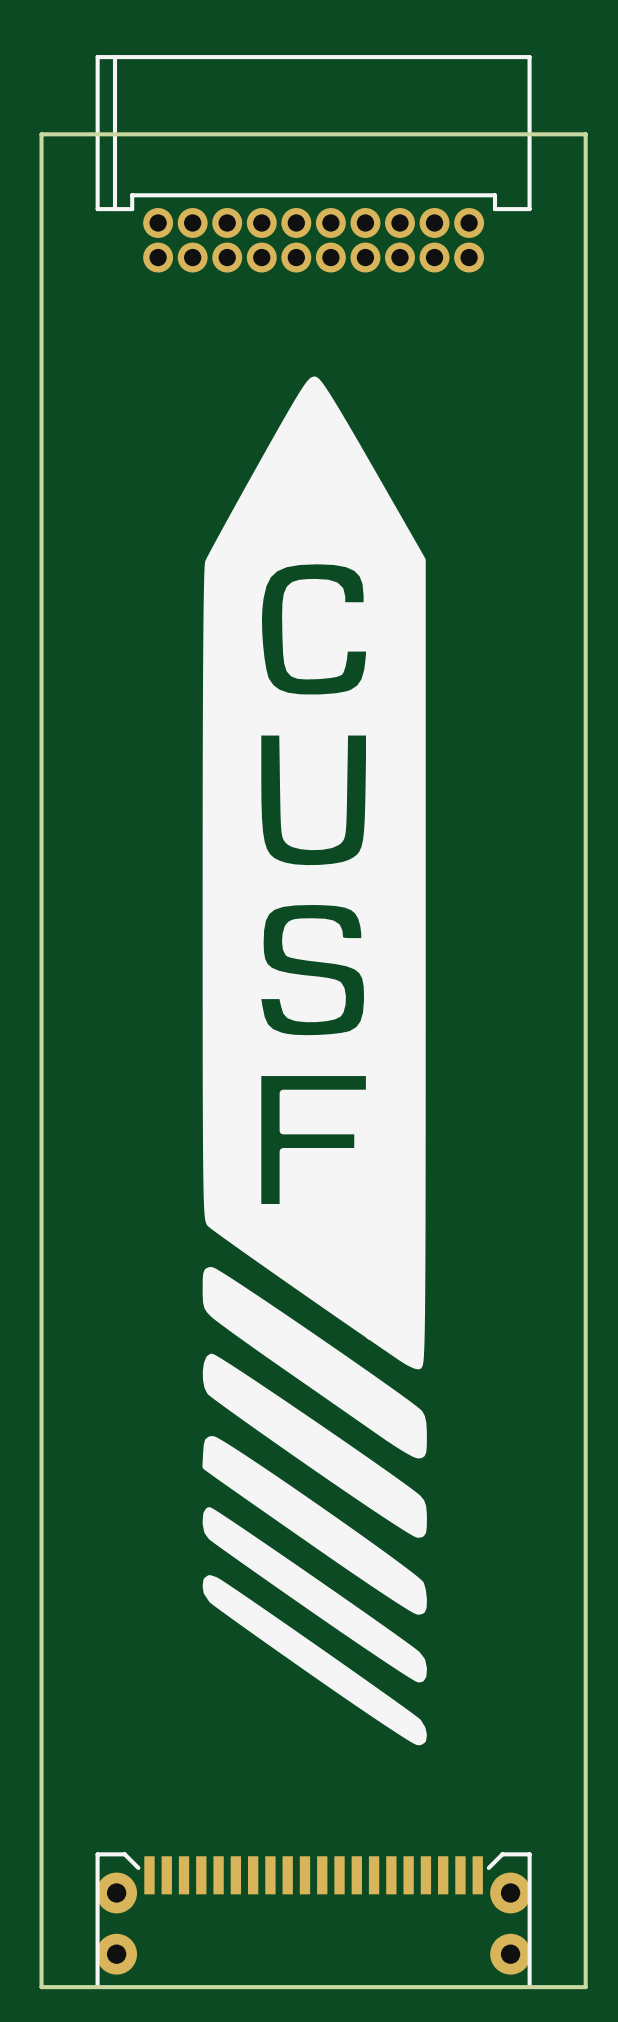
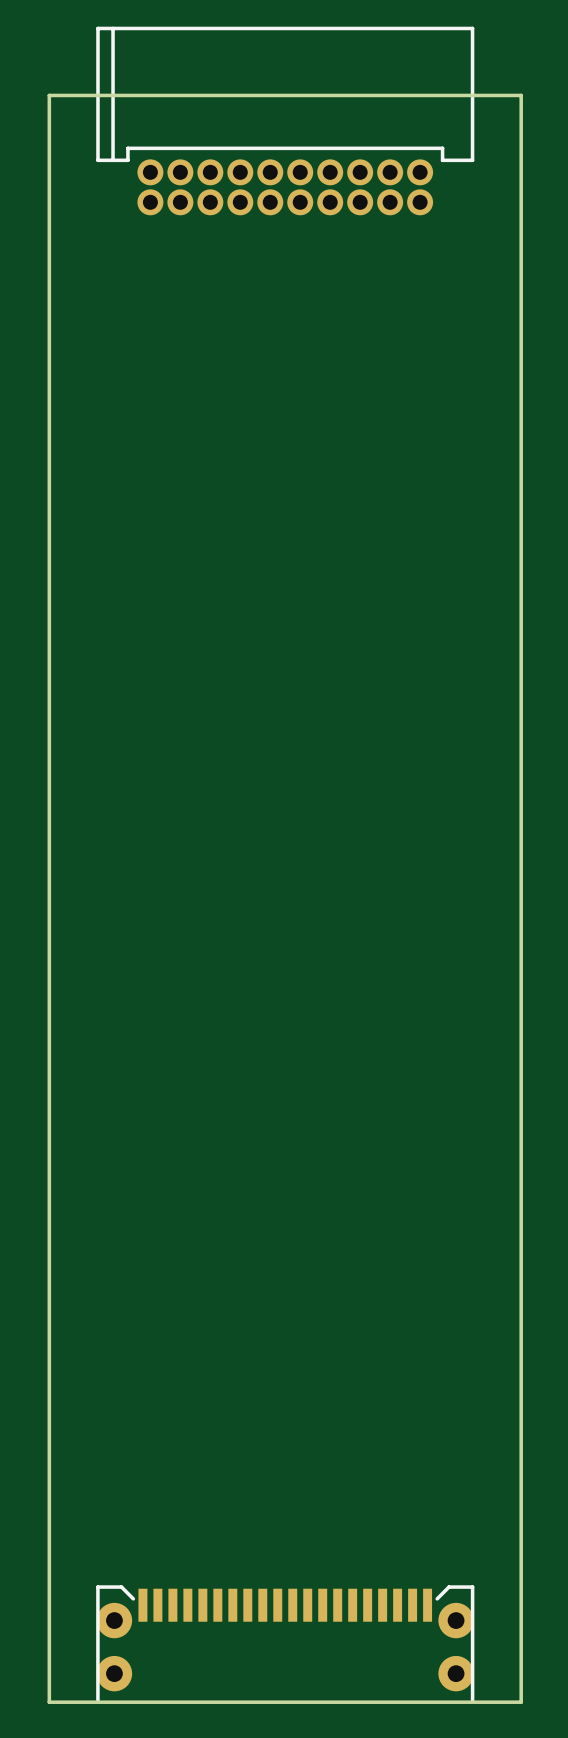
drawing: [202, 376, 427, 1746] -> none

